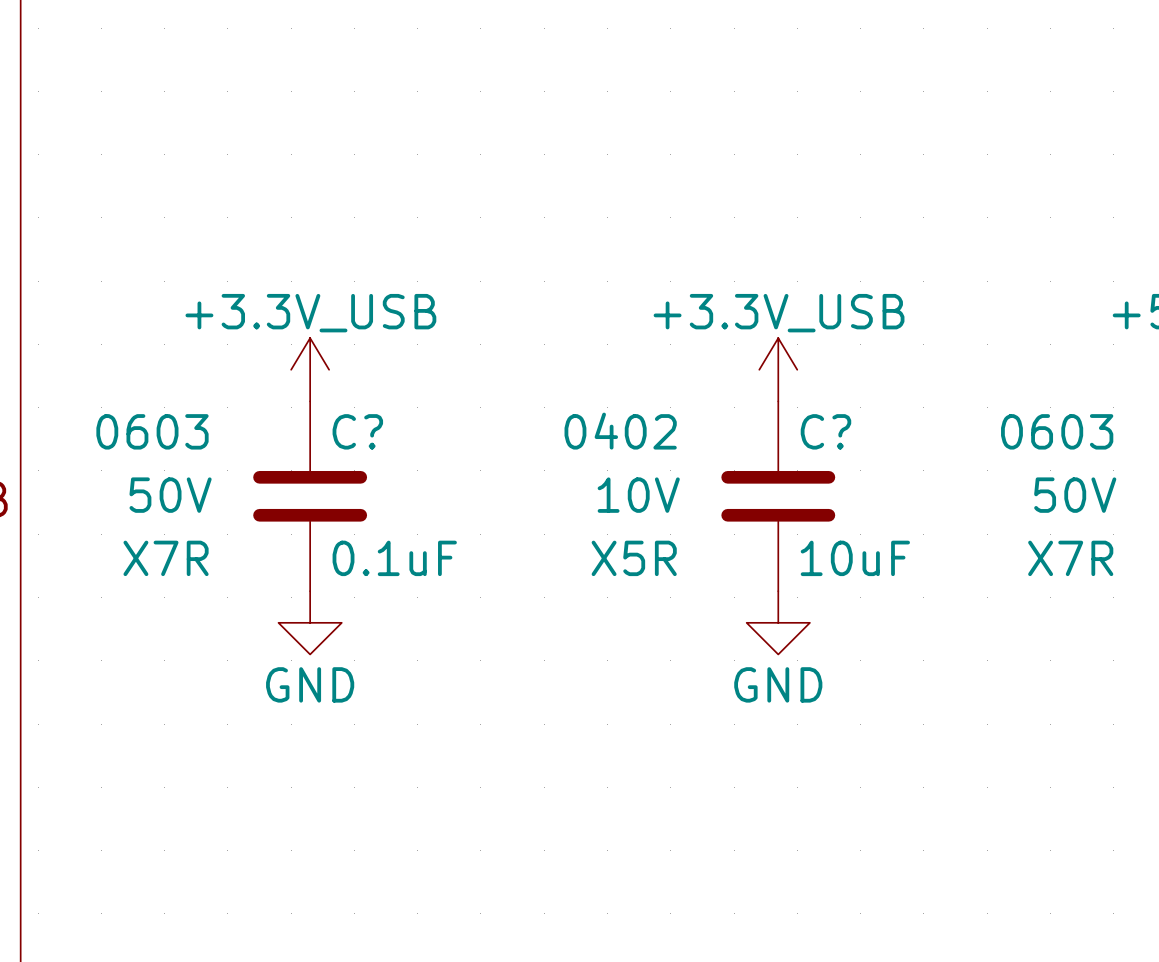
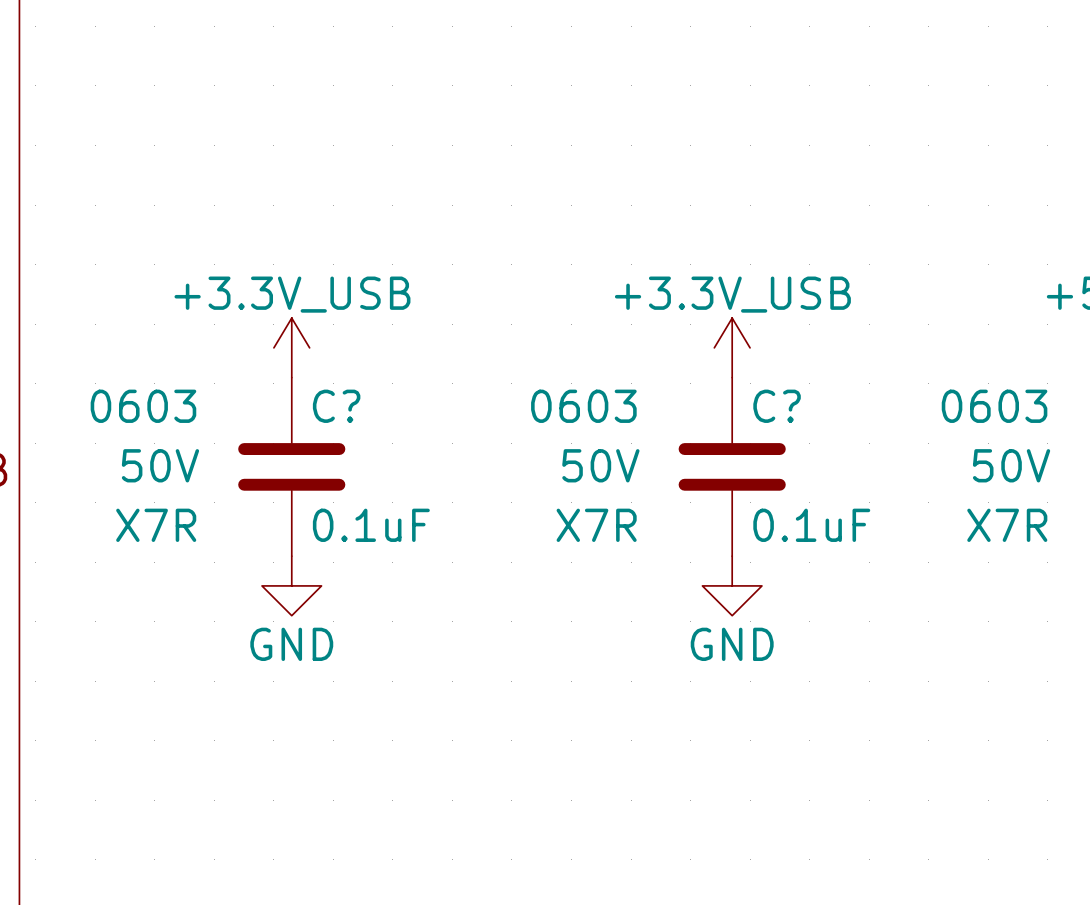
C? text: 0402 (620, 431) -> 0603 (583, 406)
C? text: 10V (638, 495) -> 50V (600, 465)
C? text: X5R (634, 558) -> X7R (596, 525)
C? value: 10uF (855, 558) -> 0.1uF (811, 525)

